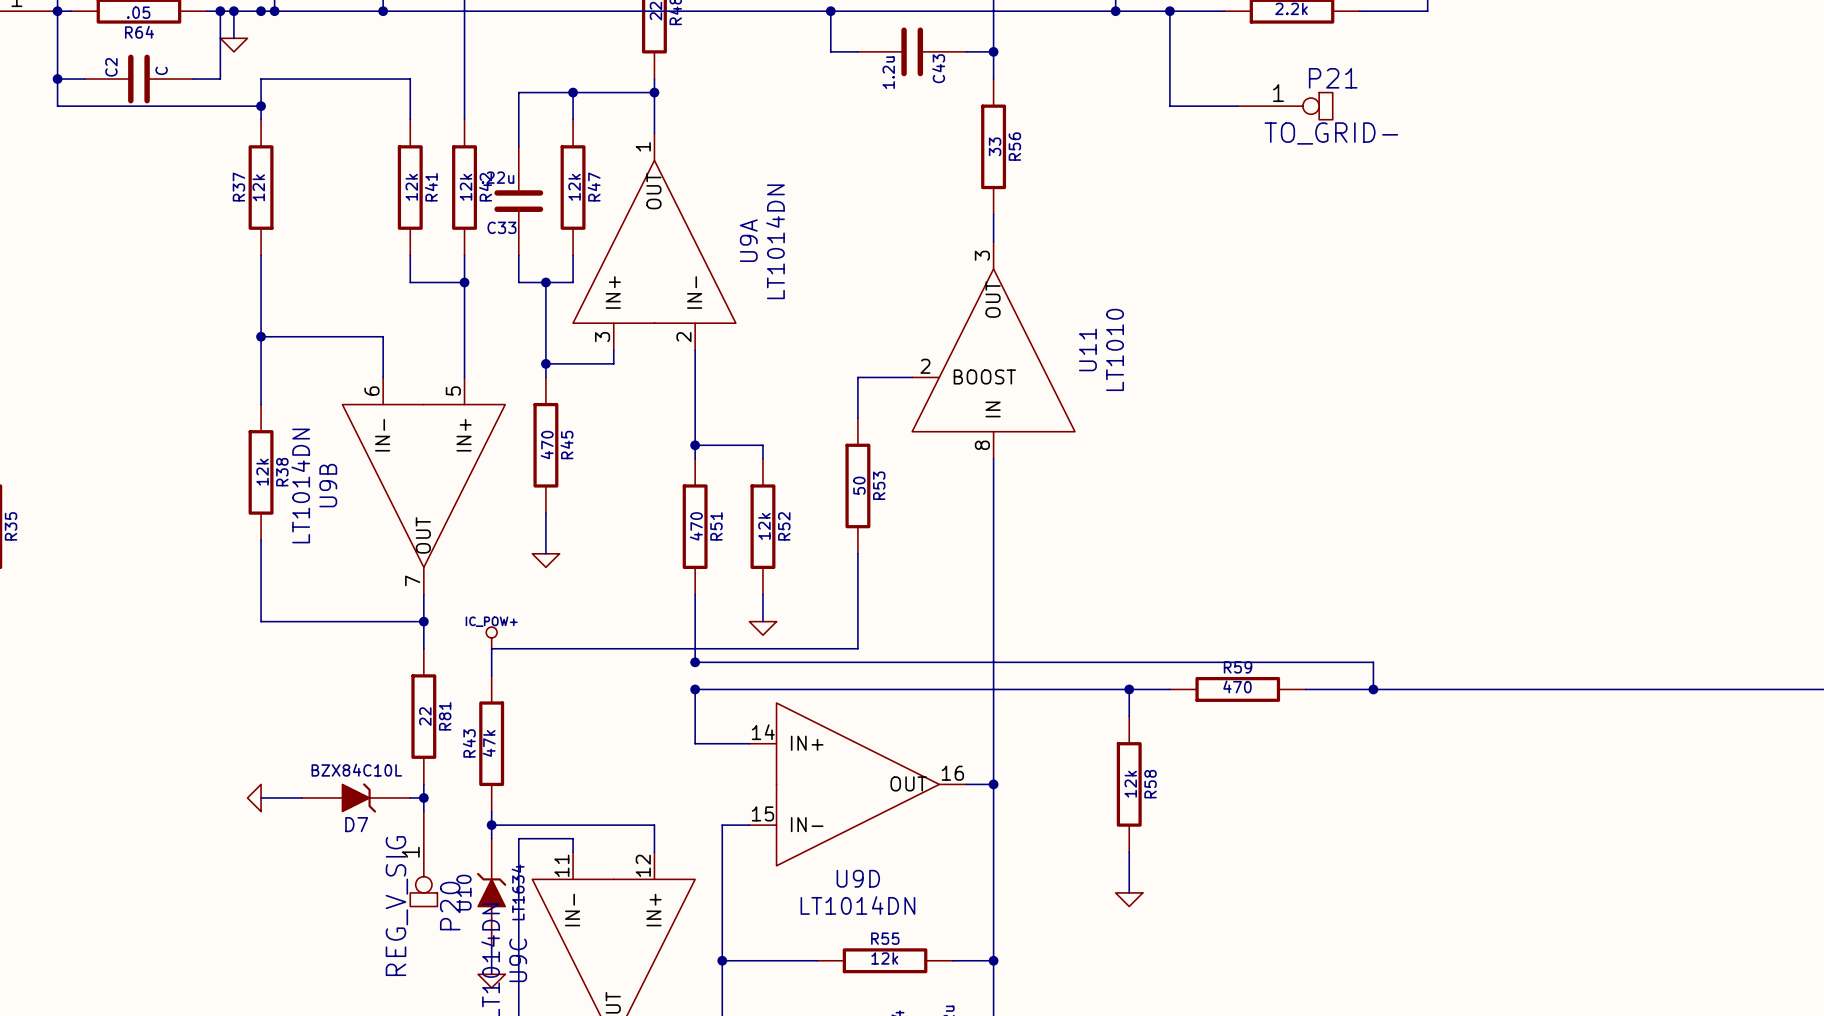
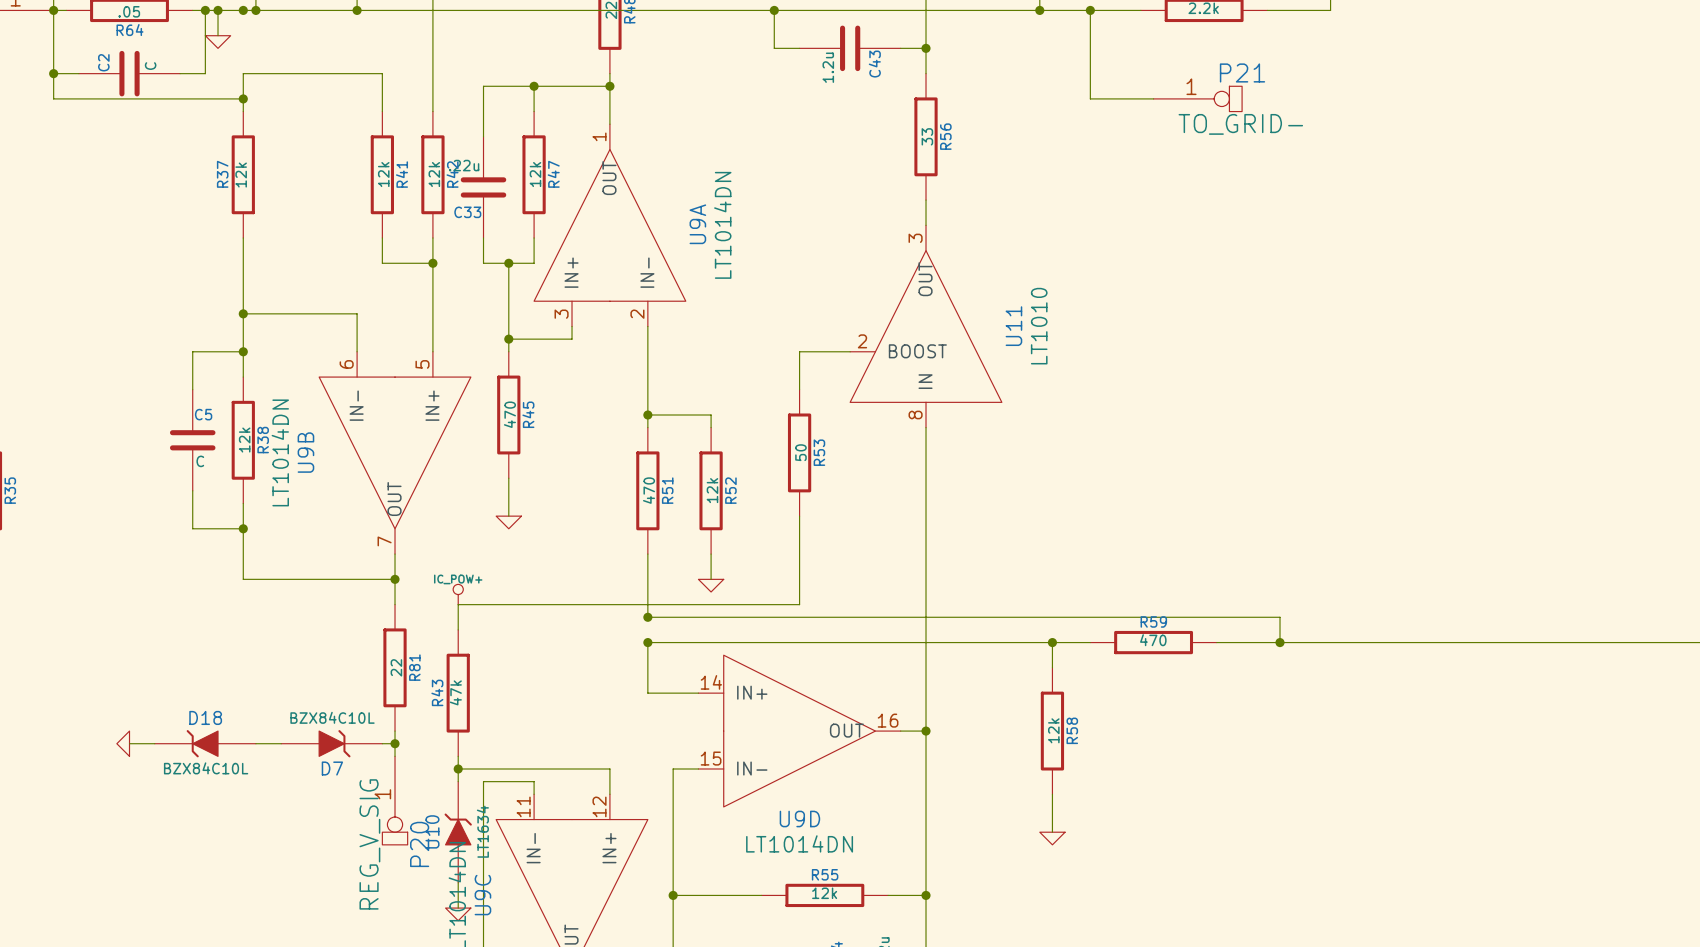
wire: none -> (243, 351) (192, 351) (192, 389)
junction: none -> (243, 351)
C5: none -> C (192, 440)
wire: none -> (192, 490) (192, 528) (243, 528)
junction: none -> (243, 528)
wire: none -> (129, 743) (154, 743)
D18: none -> BZX84C10L (205, 743)
power symbol position: (254, 797) -> (123, 743)

